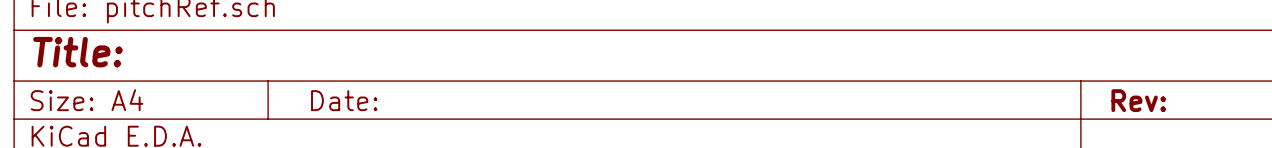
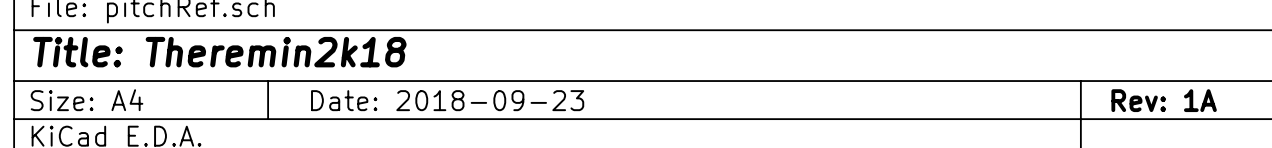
title block: Title: (77, 52) -> Title: Theremin2k18 (219, 52)
title block: Date: (344, 100) -> Date: 2018-09-23 (447, 100)
title block: Rev: (1138, 100) -> Rev: 1A (1164, 100)

